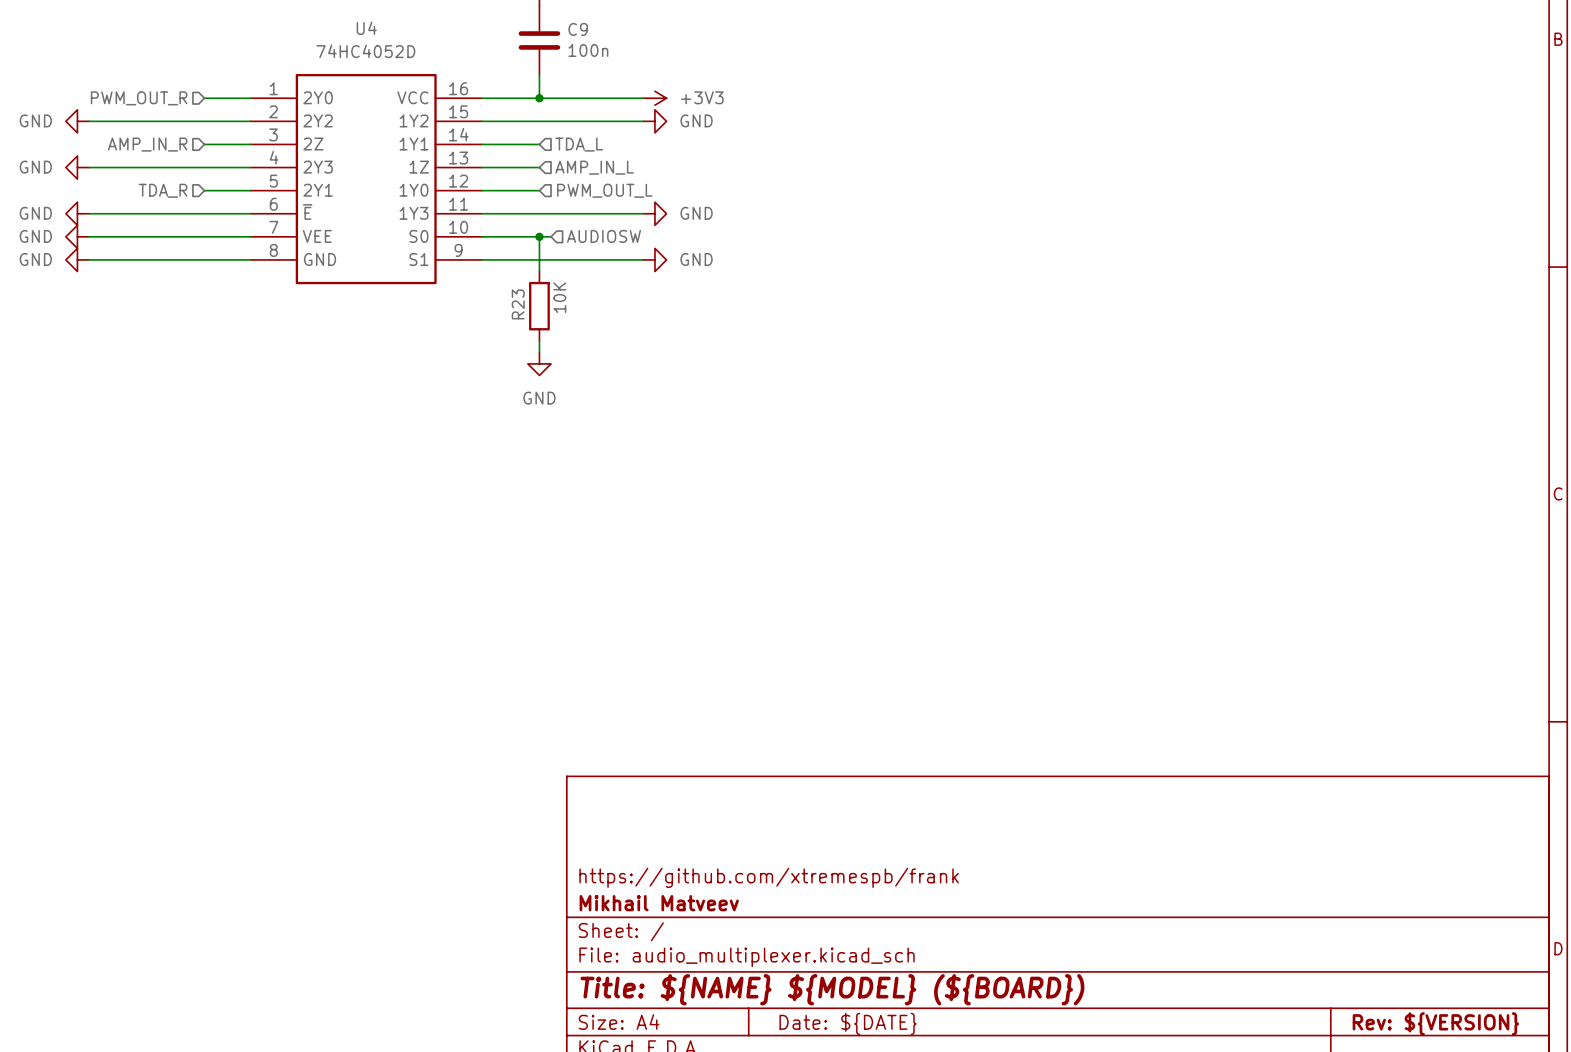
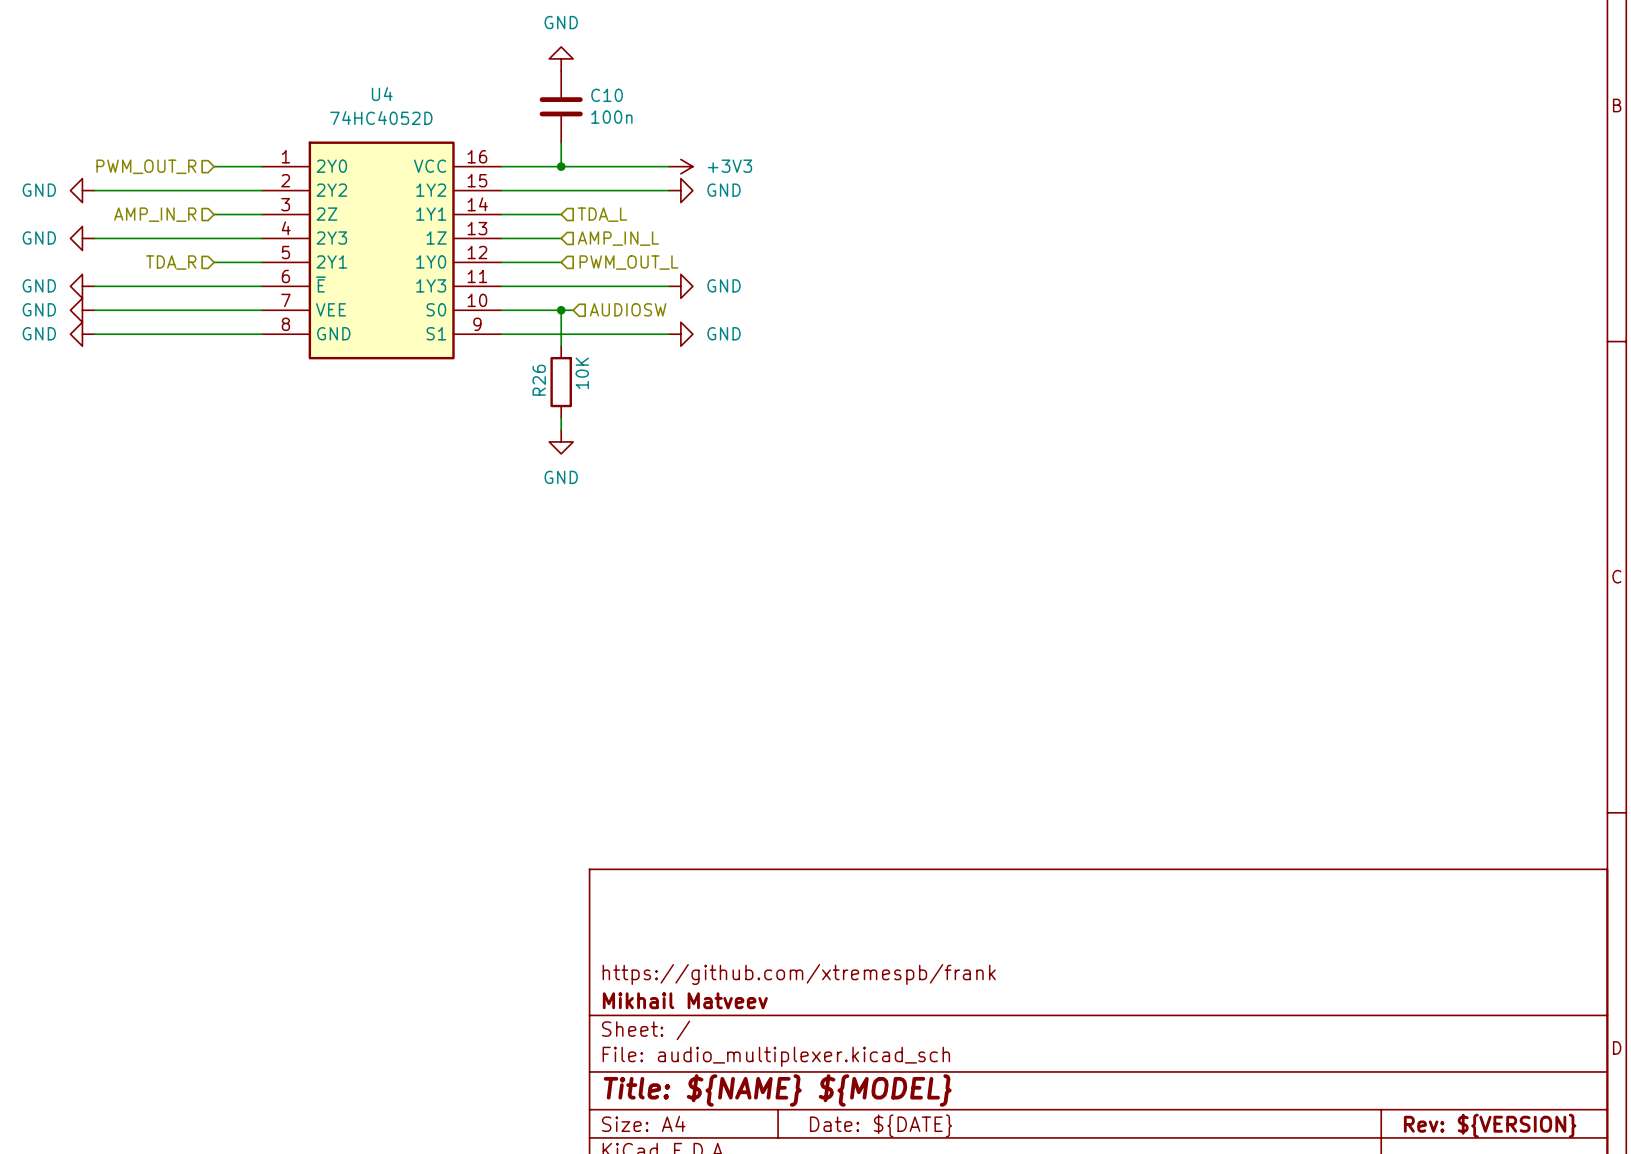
C9 name: C9 (578, 29) -> C10 (607, 95)
R23 name: R23 (518, 304) -> R26 (539, 380)
title block: Title: ${NAME} ${MODEL} (${BOARD}) (832, 989) -> Title: ${NAME} ${MODEL} (777, 1090)

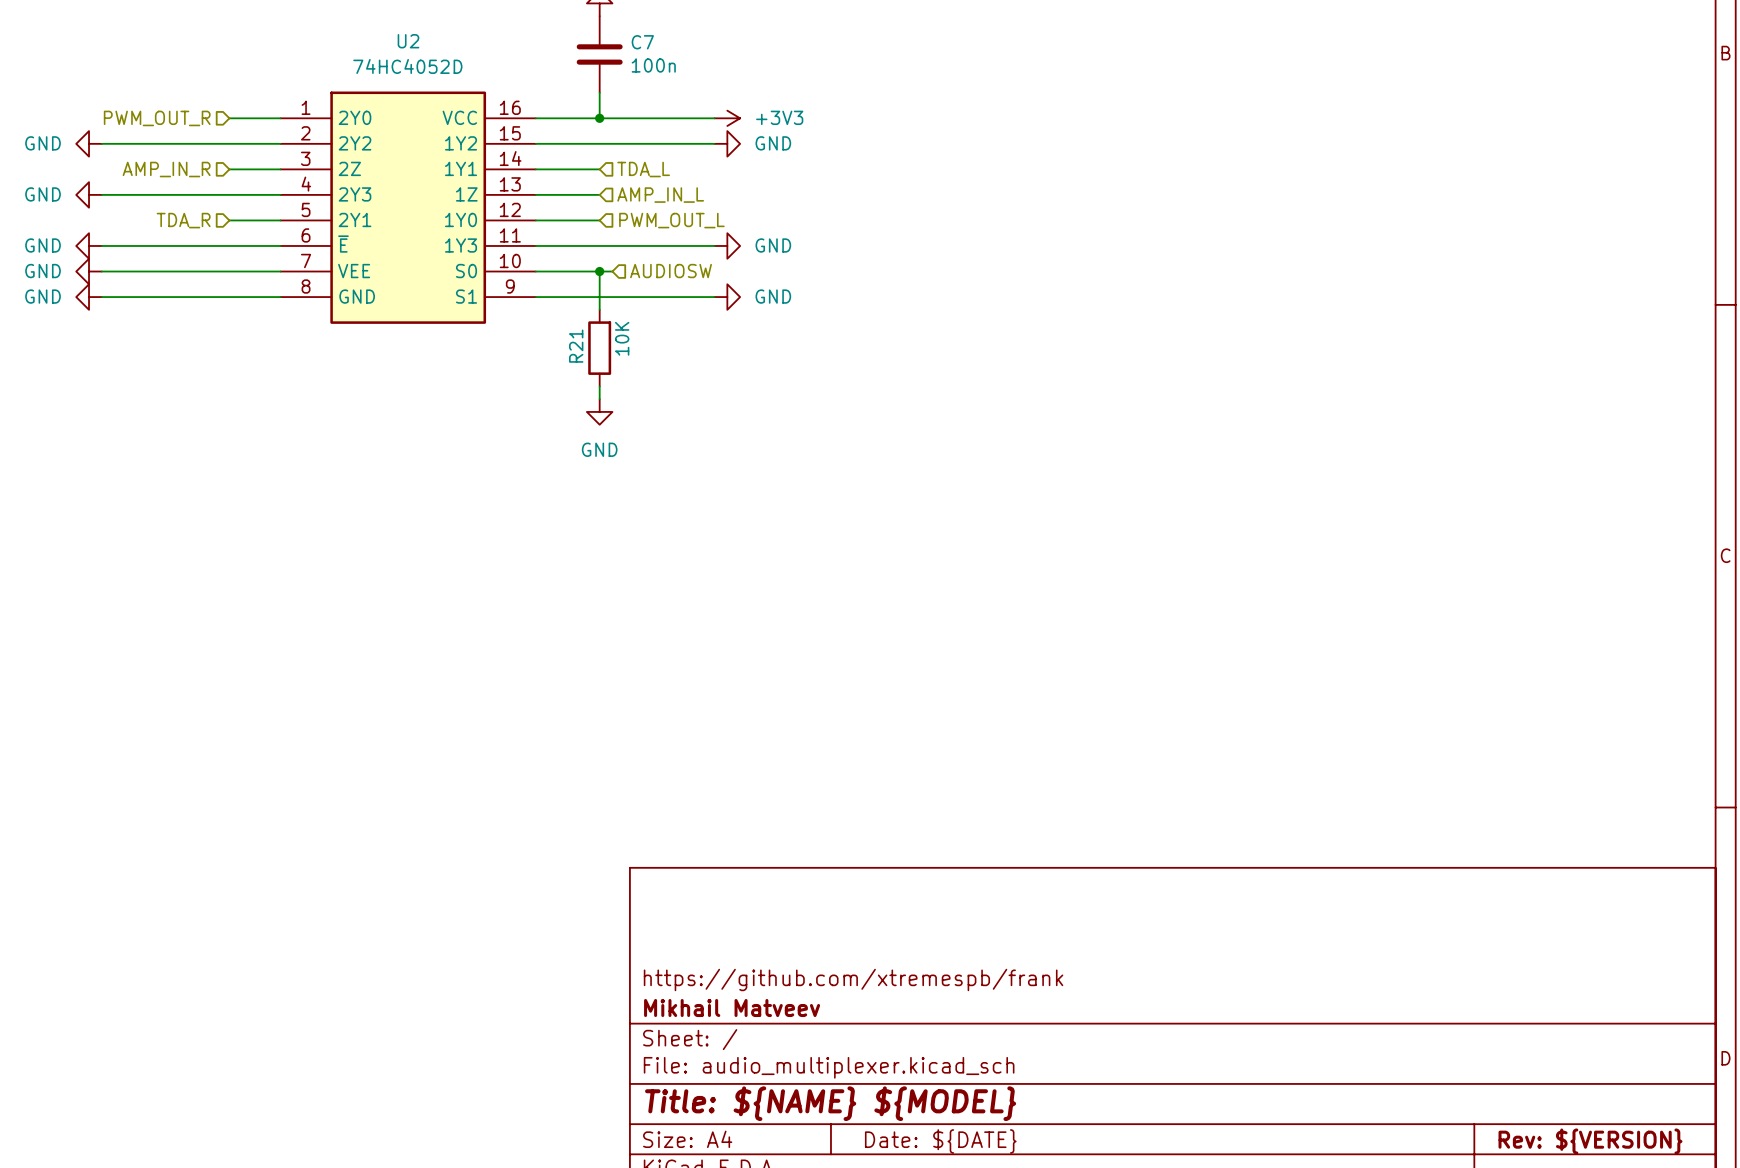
U4 name: U4 (382, 94) -> U2 (408, 41)
C10 name: C10 (607, 95) -> C7 (642, 42)
R26 name: R26 (539, 380) -> R21 (576, 346)

